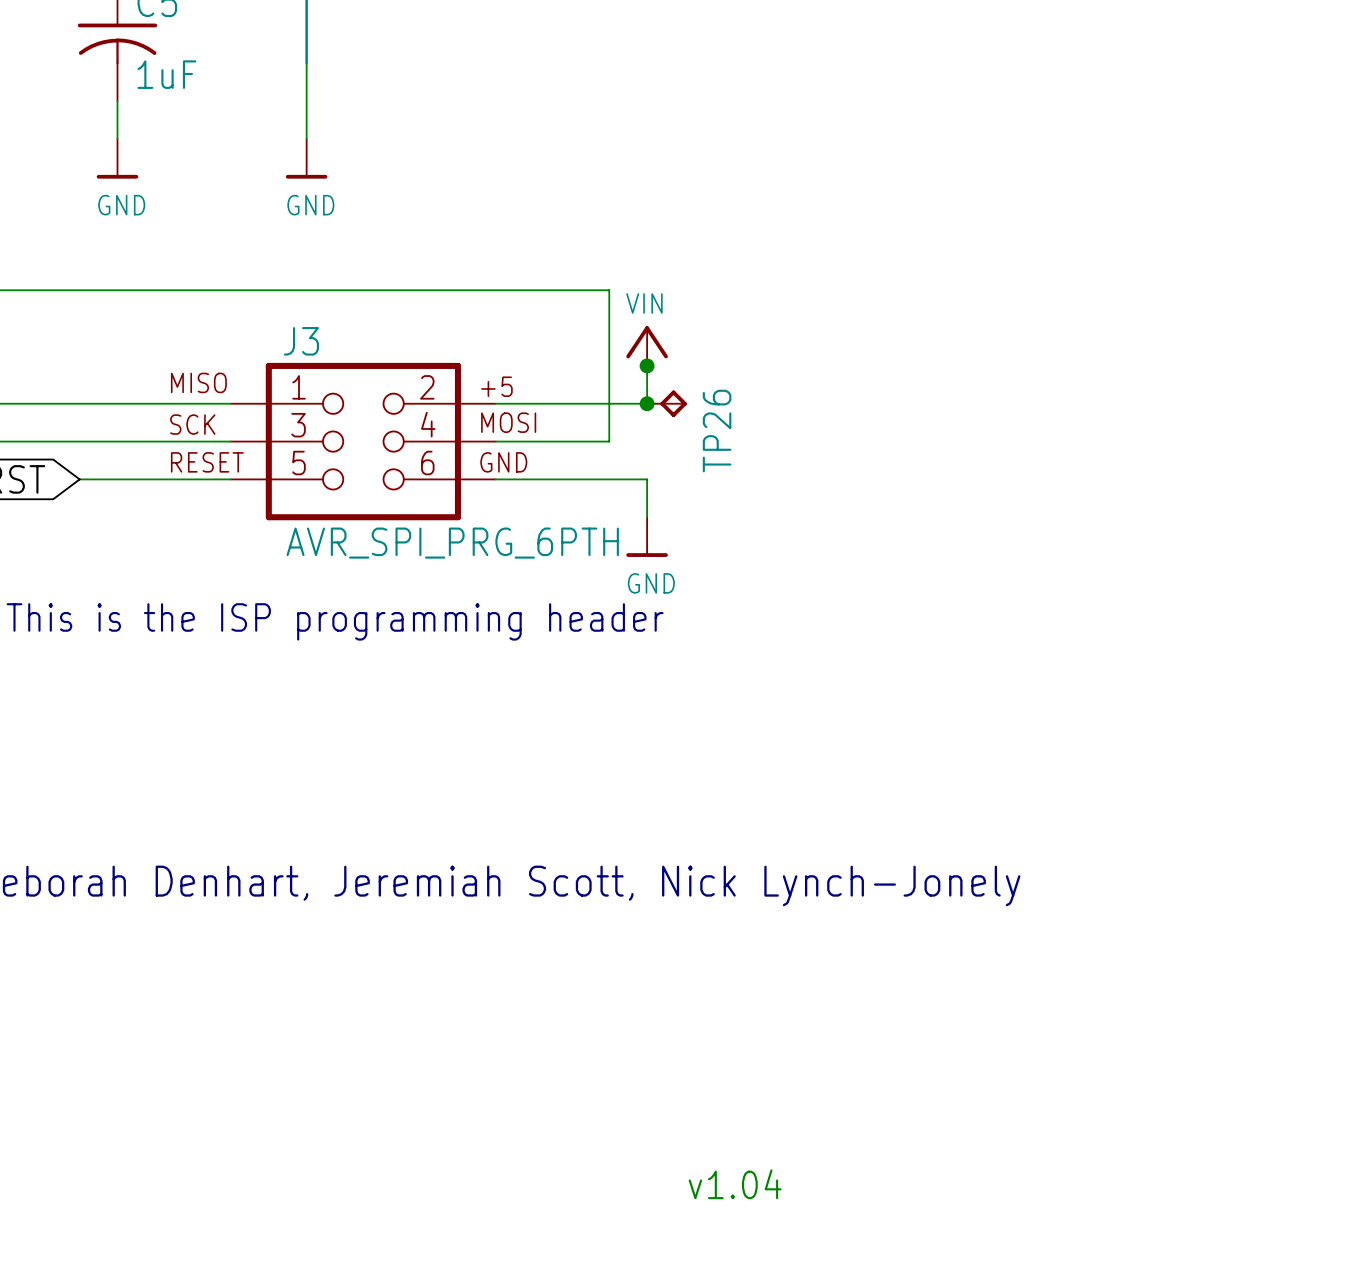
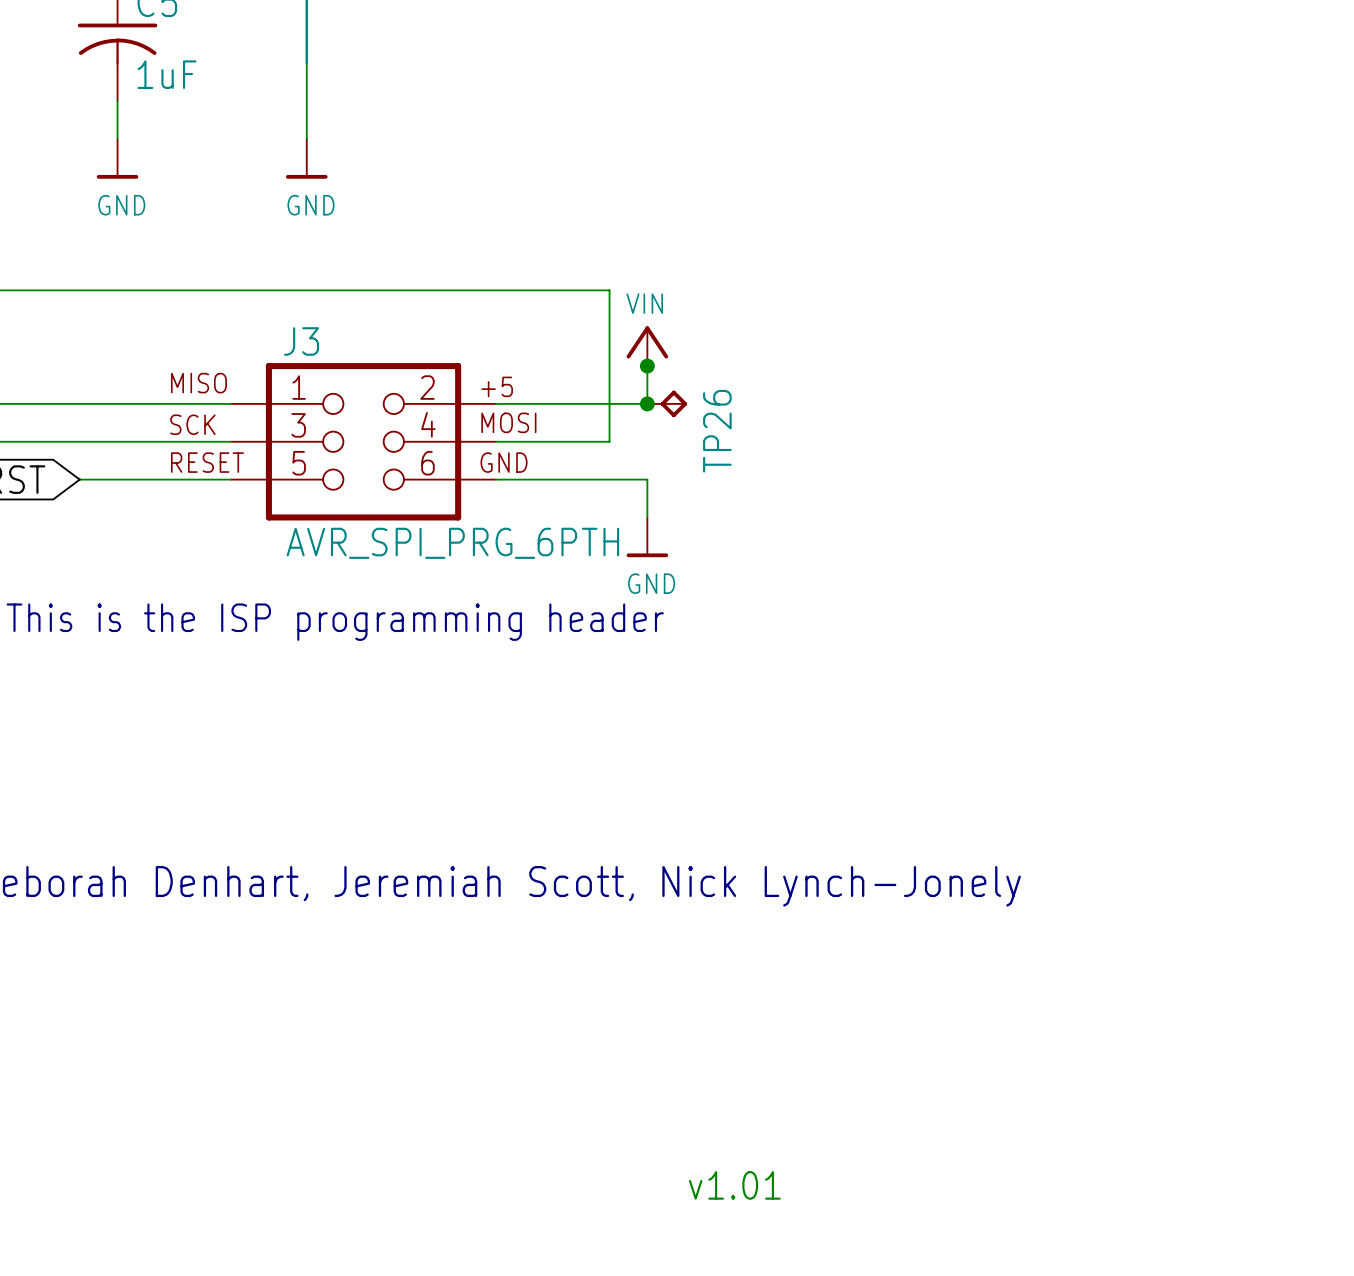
text: v1.04 (735, 1184) -> v1.01 (734, 1185)

